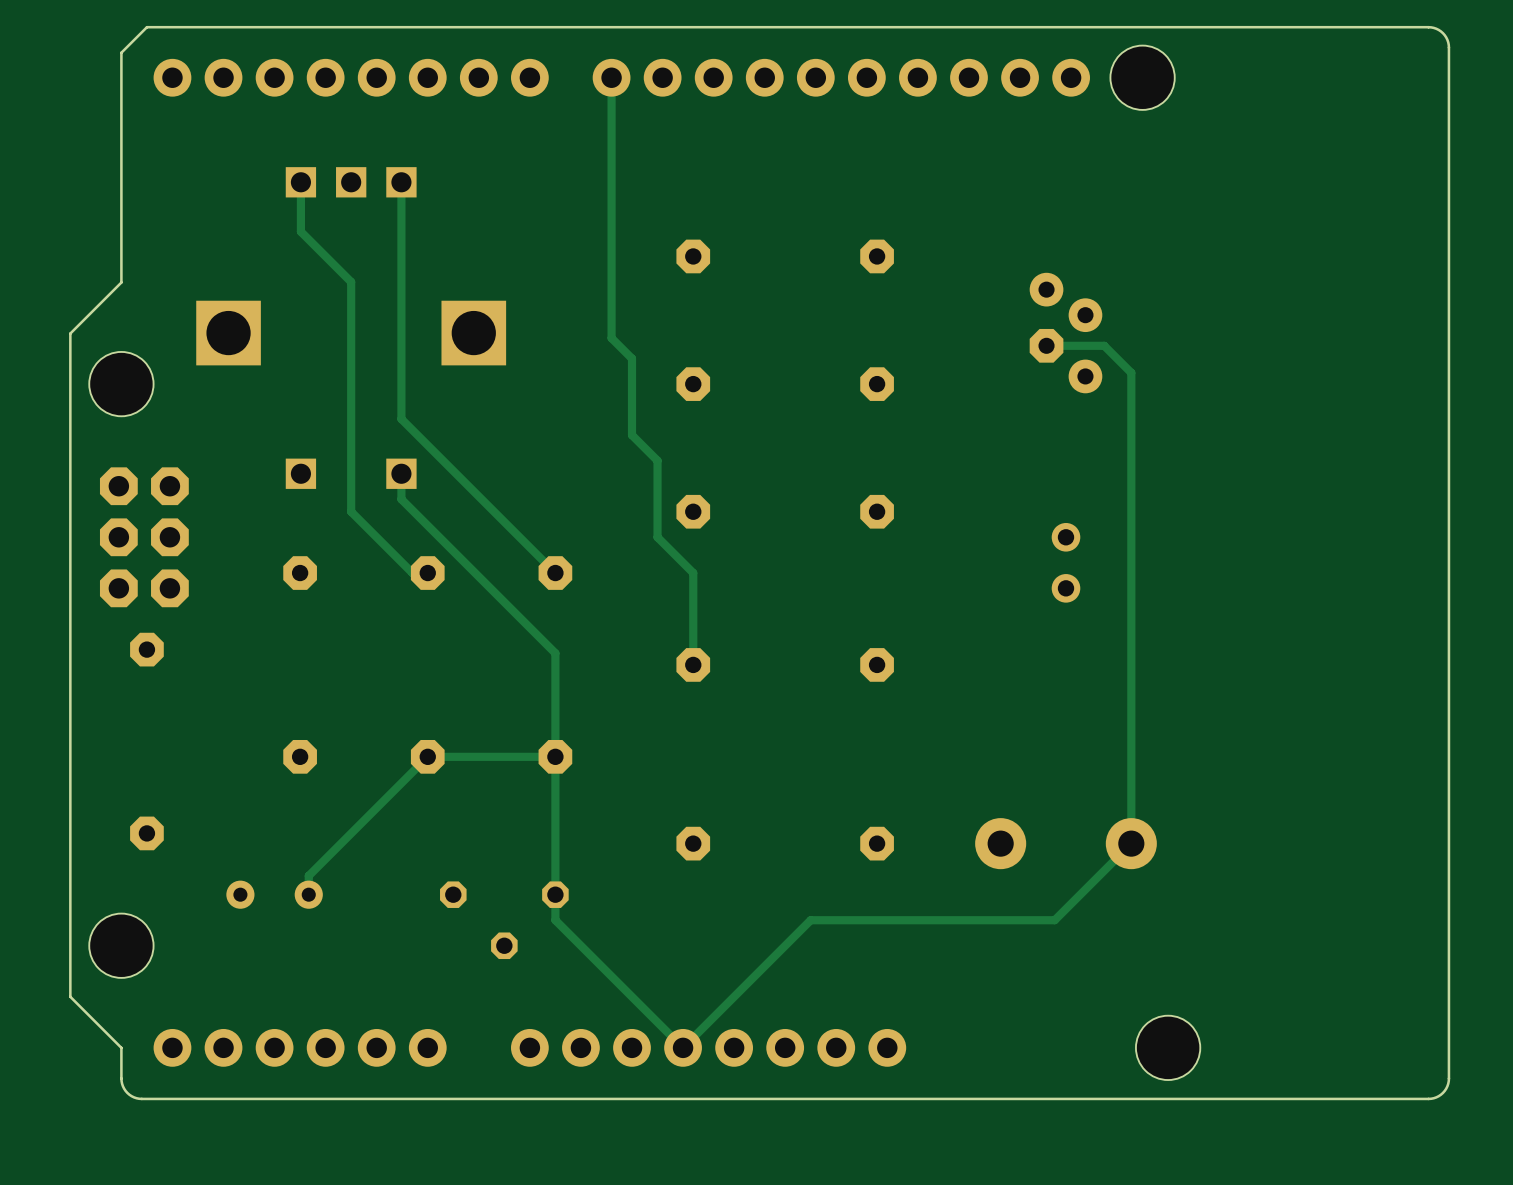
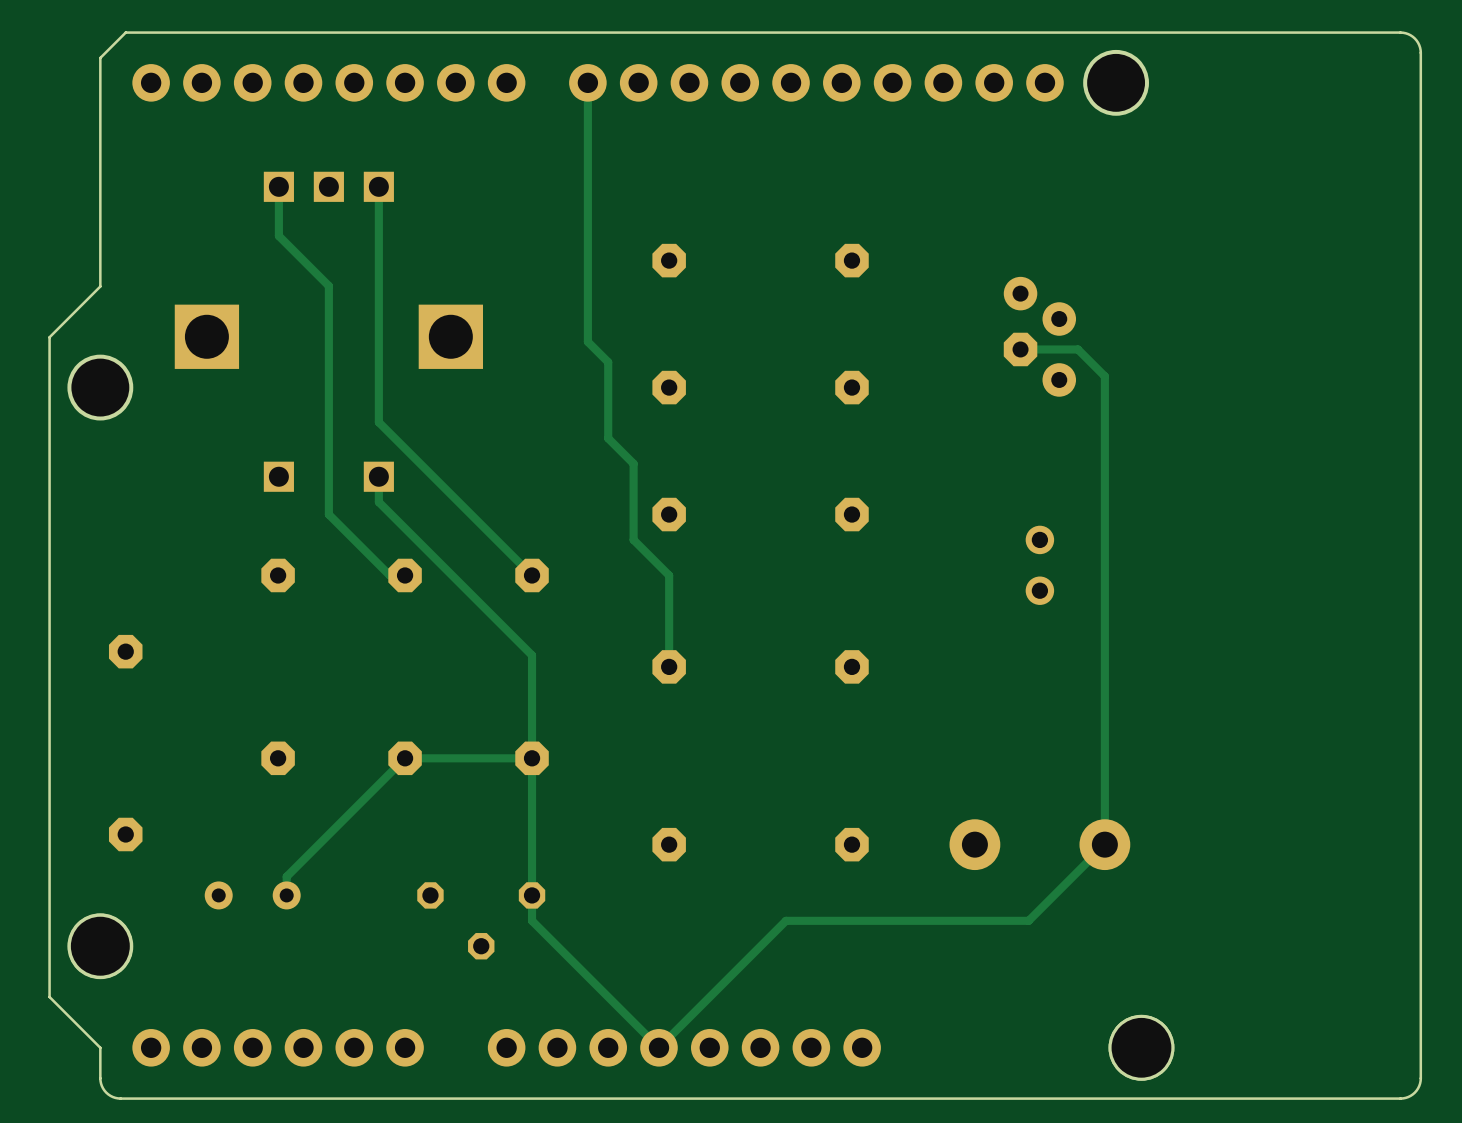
part footprint: [69, 25, 1451, 1101] -> [48, 31, 1423, 1100]

